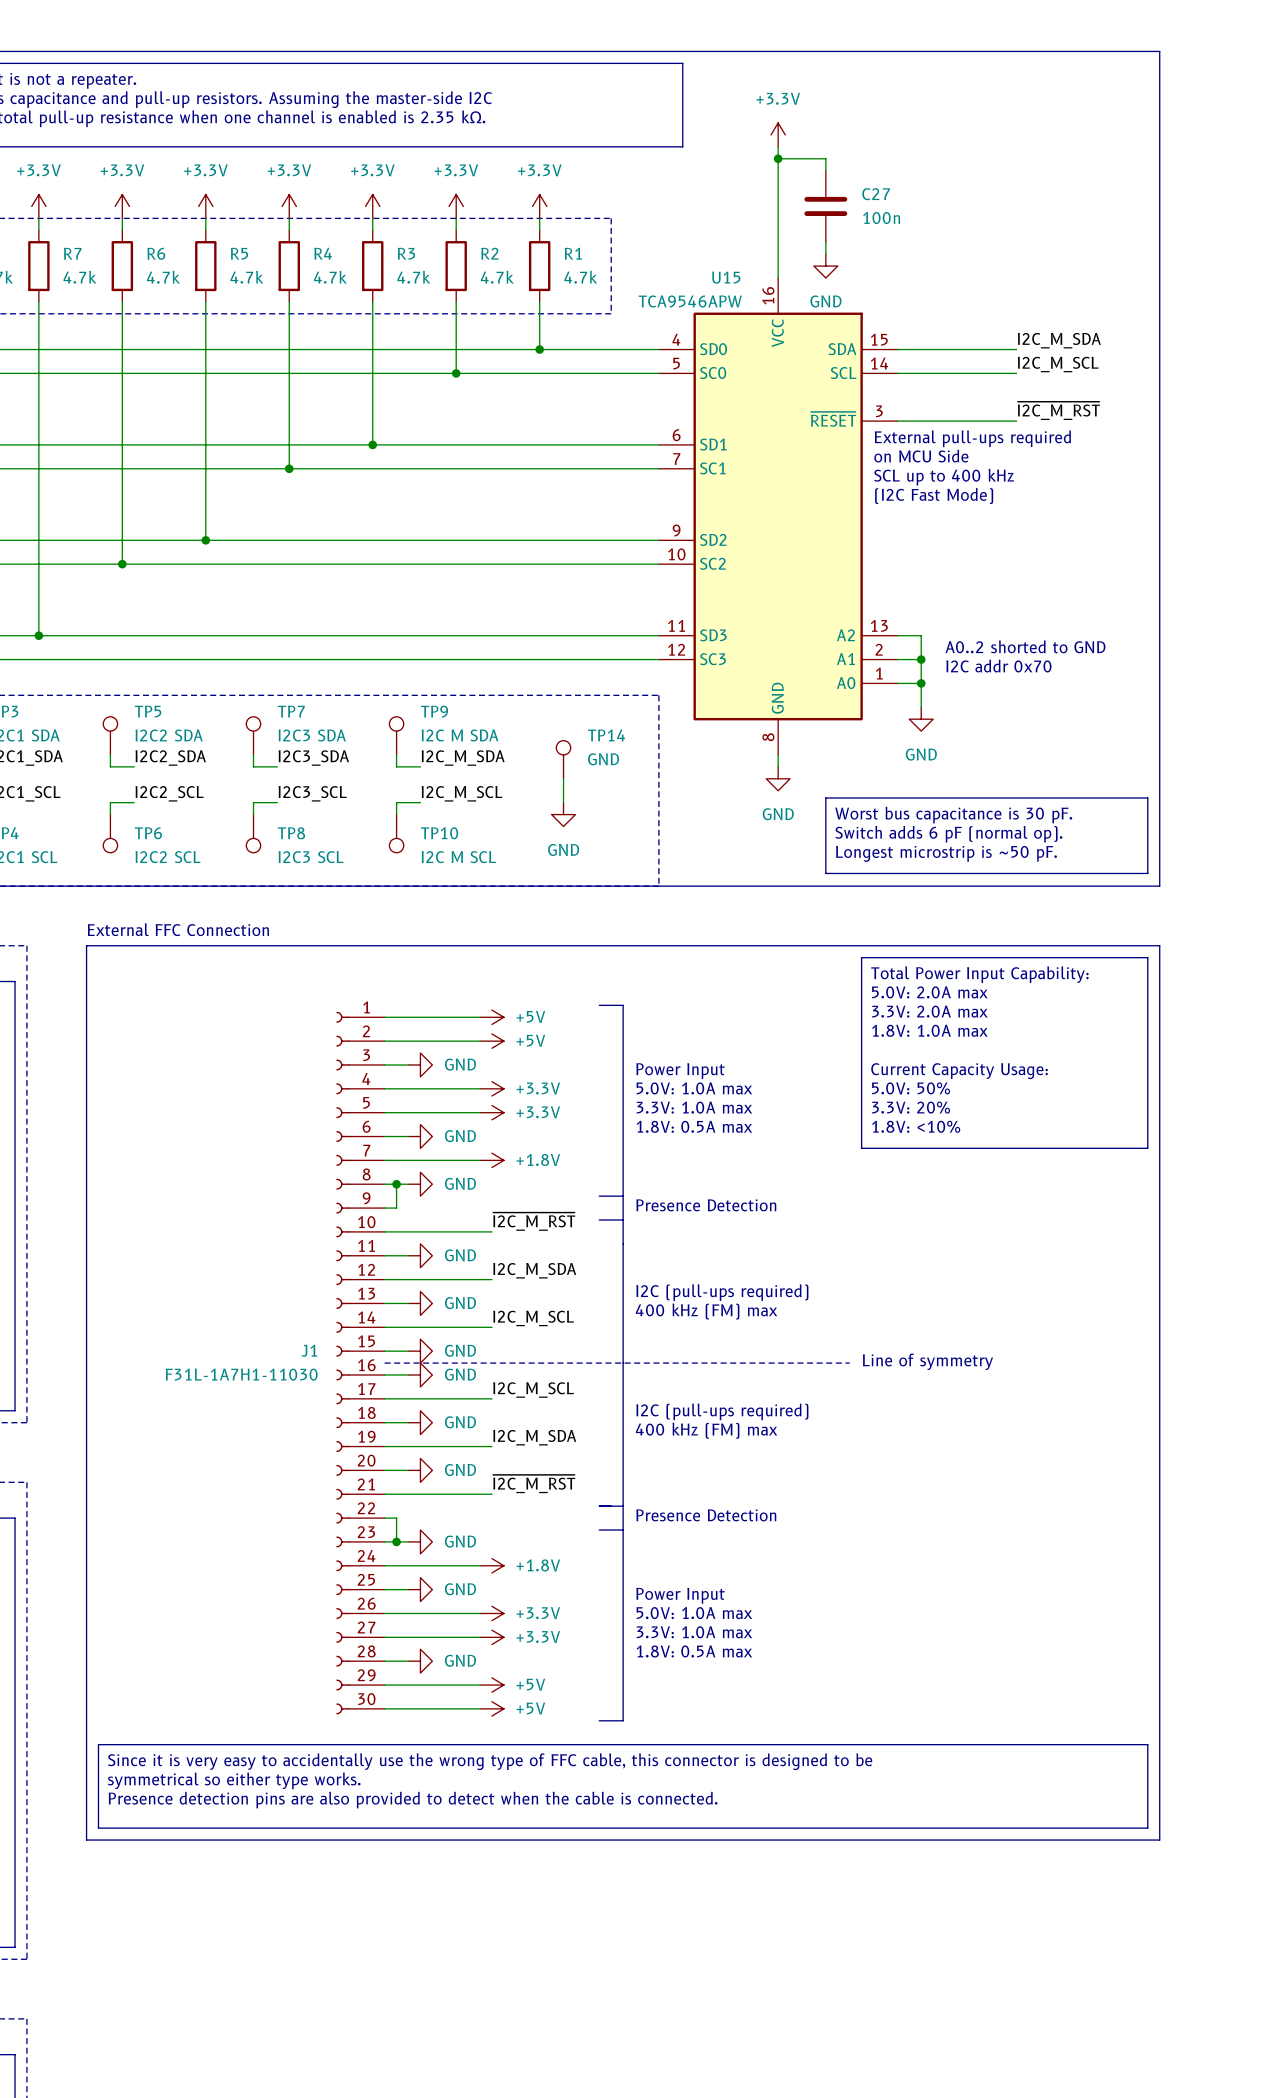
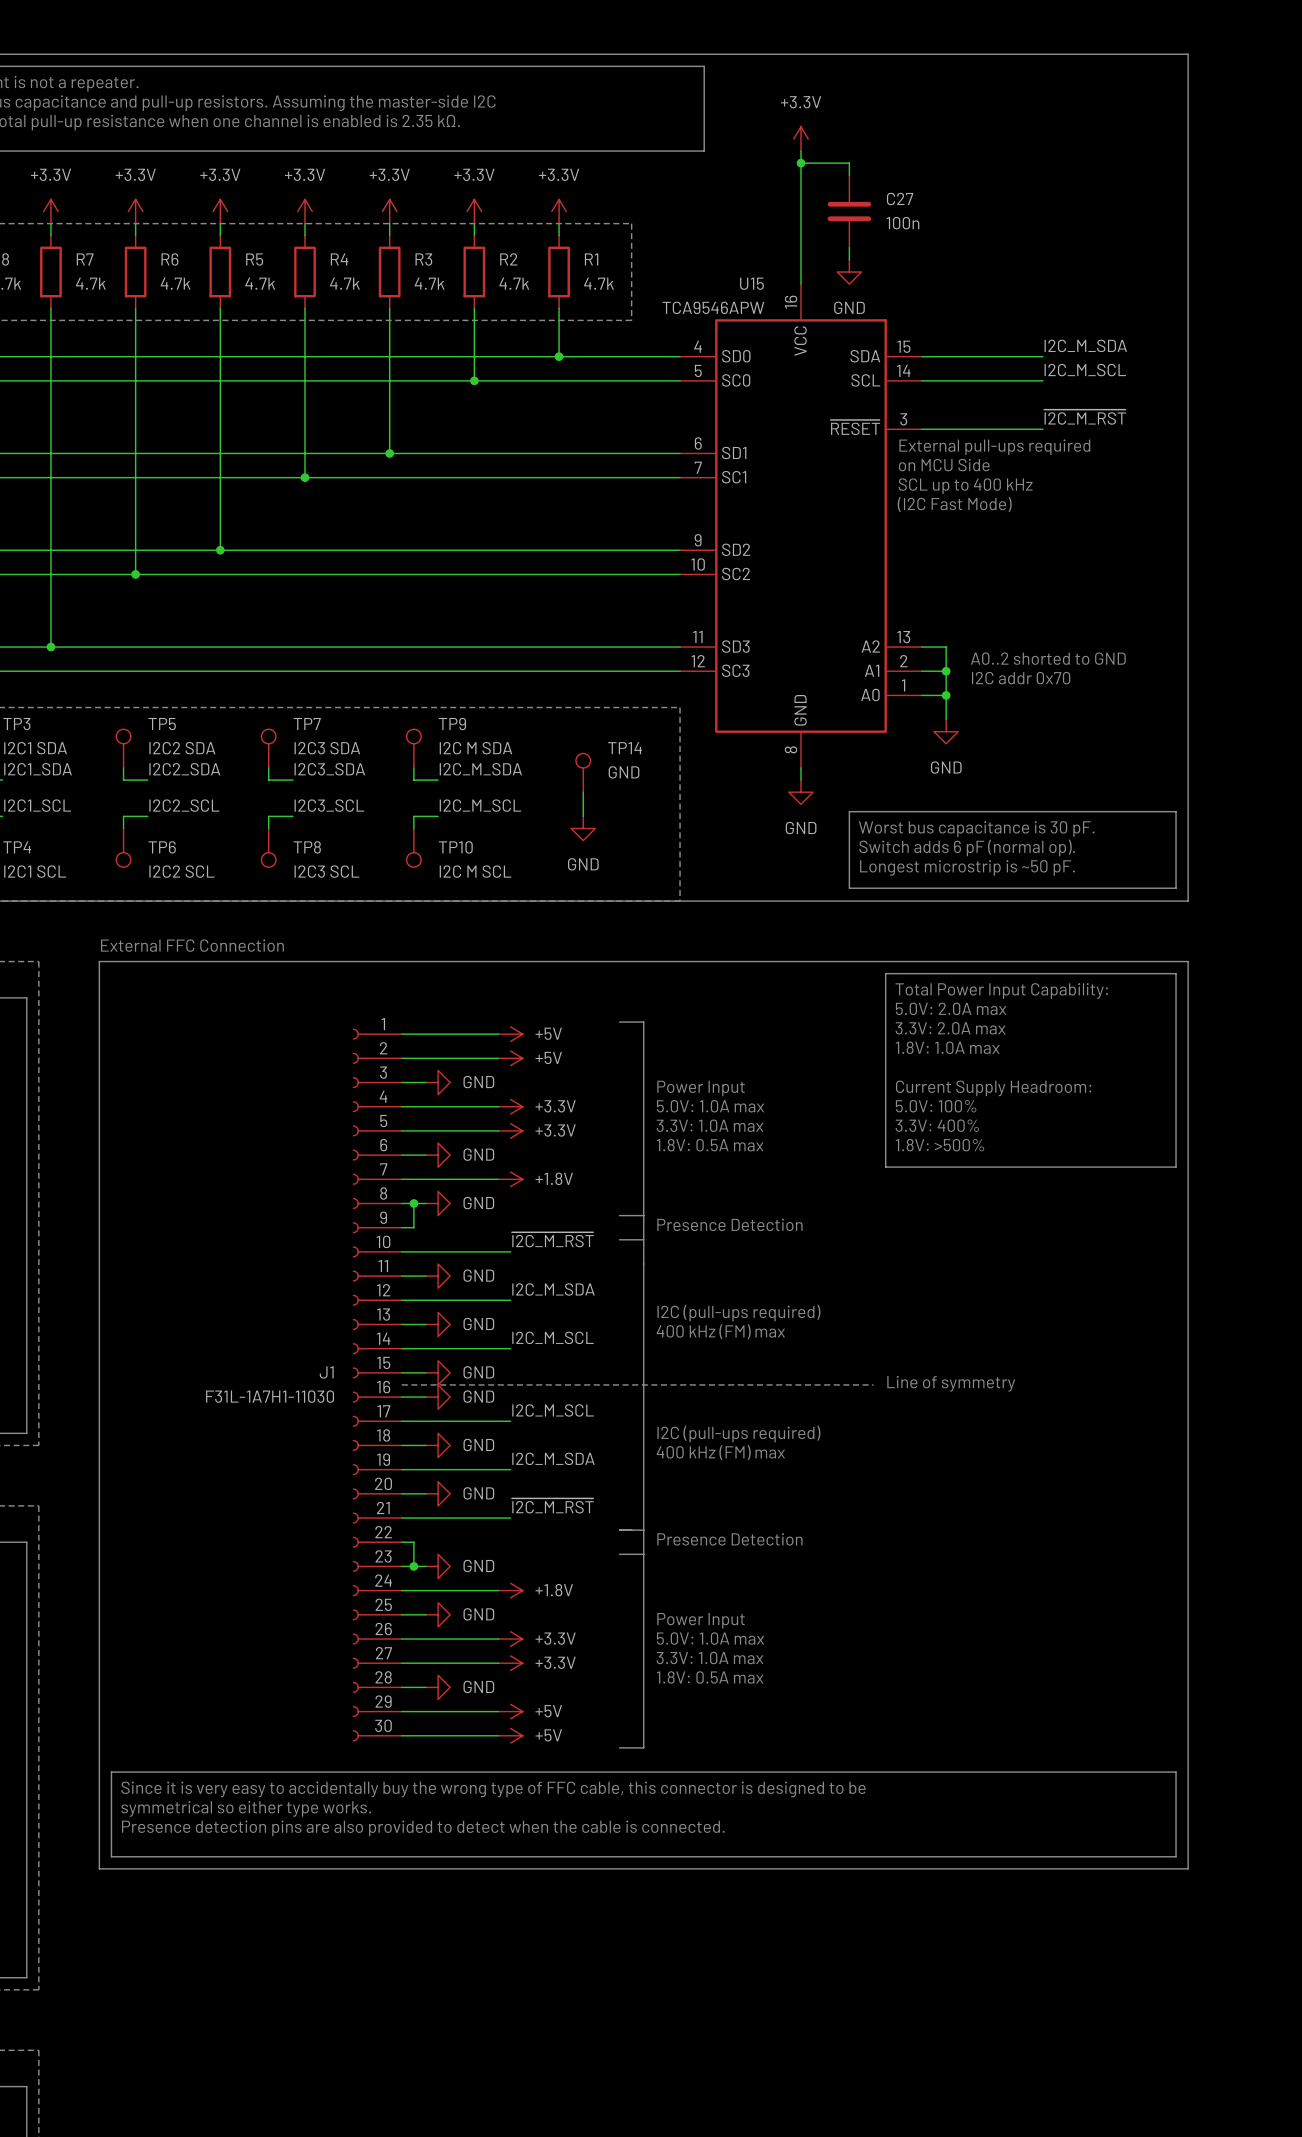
text: Current Capacity Usage: (959, 1071) -> Current Supply Headroom: (993, 1088)
text: 5.0V: 50% (911, 1088) -> 5.0V: 100% (936, 1106)
text: 3.3V: 20% (911, 1107) -> 3.3V: 400% (937, 1125)
text: 1.8V: <10% (916, 1126) -> 1.8V: >500% (939, 1145)
text: Since it is very easy to accidentally use the wrong type of FFC cable, this connector is designed to be (490, 1761) -> Since it is very easy to accidentally buy the wrong type of FFC cable, this connector is designed to be (493, 1789)

